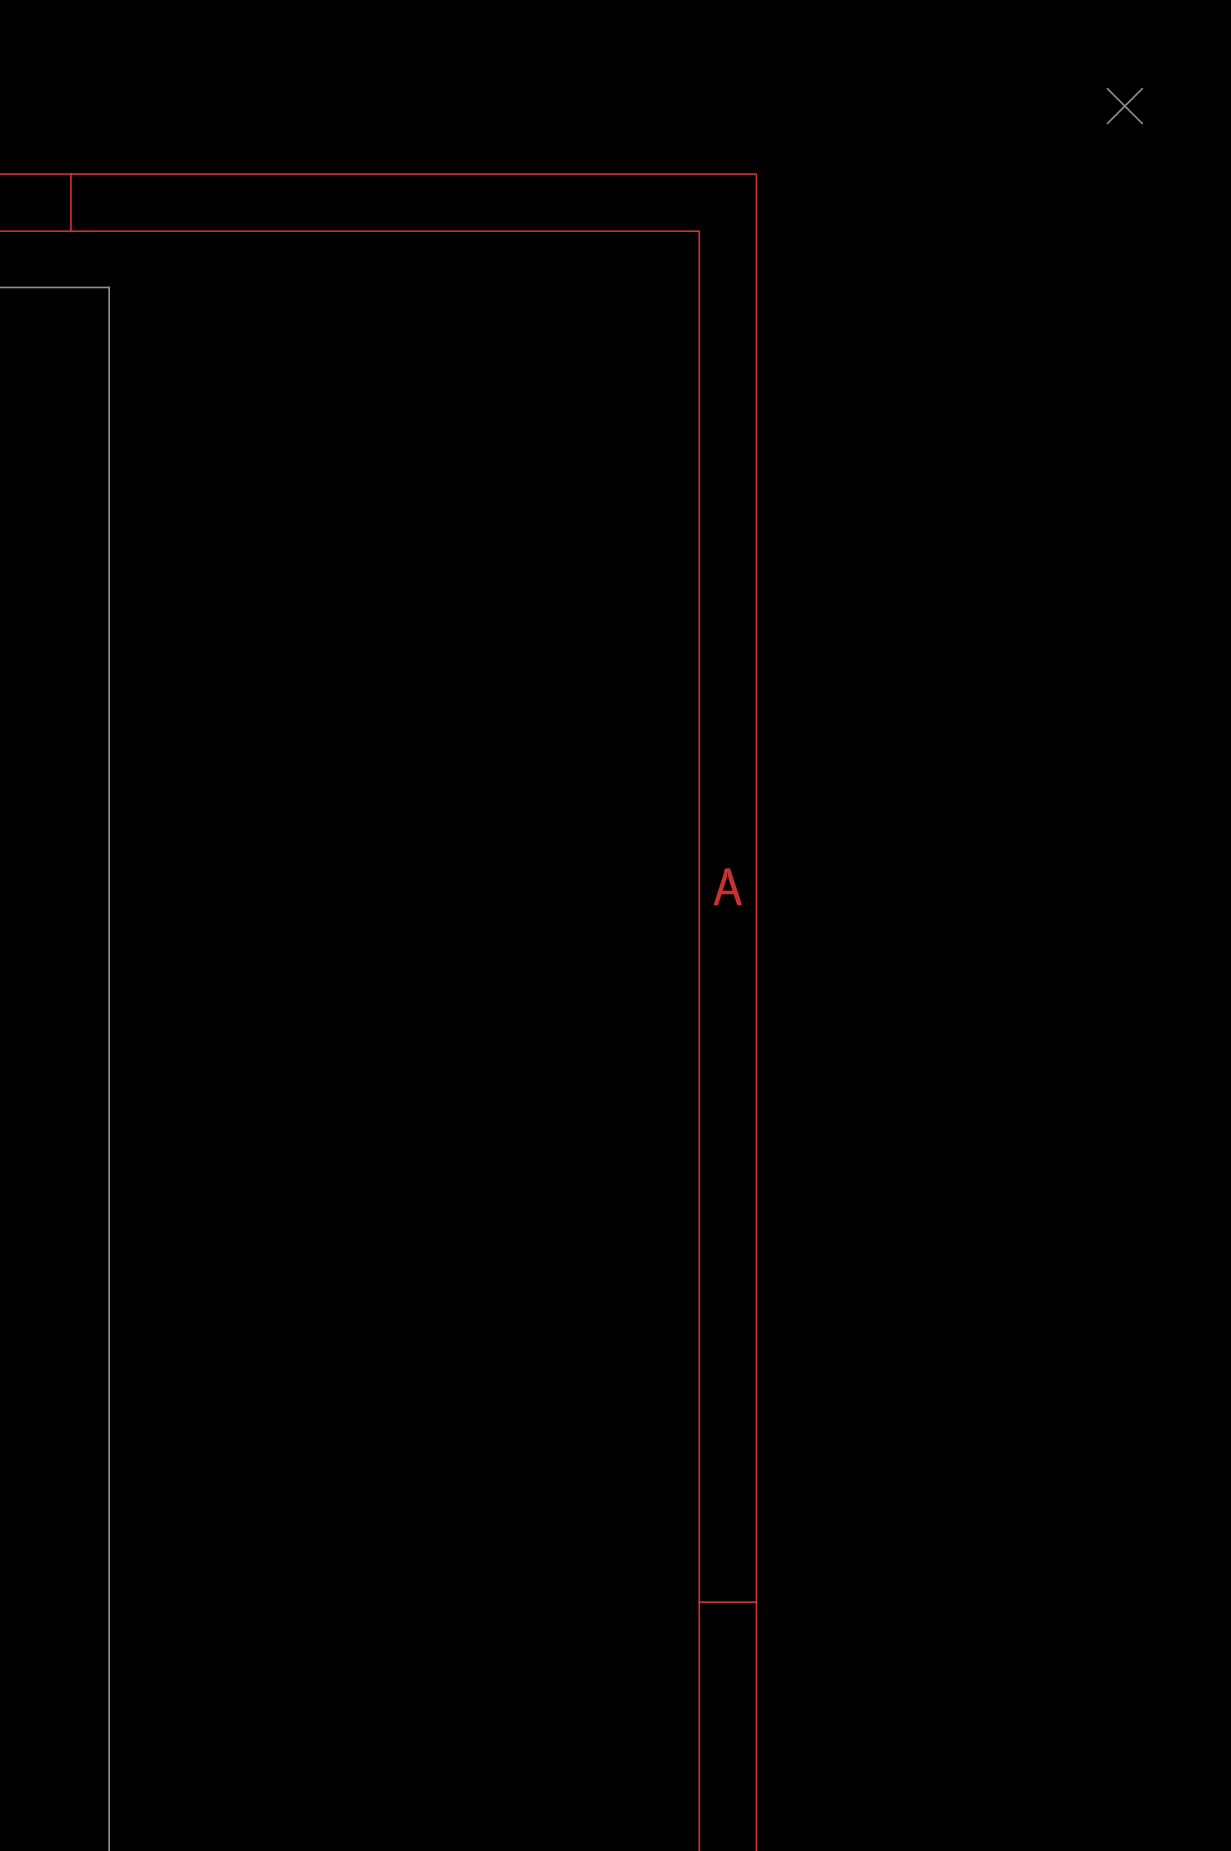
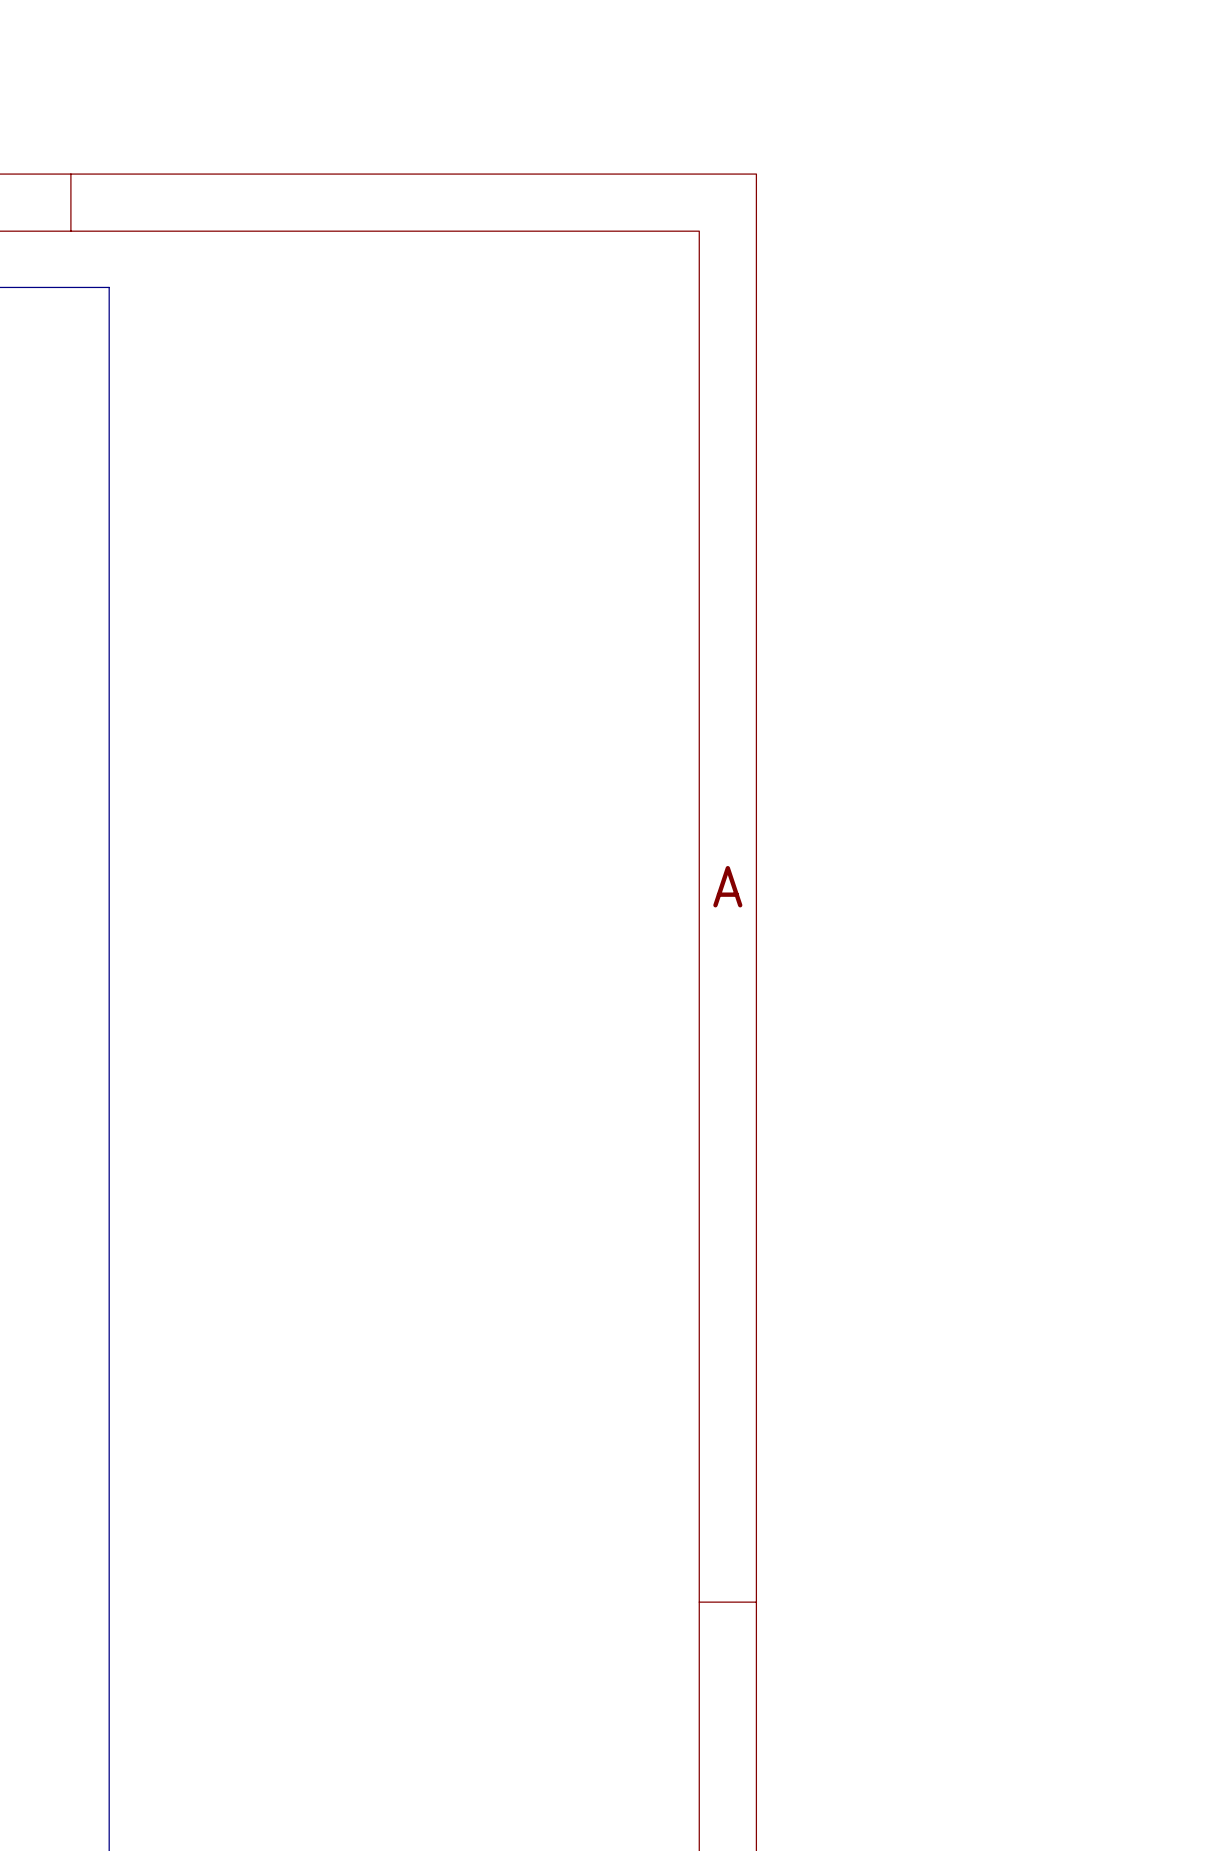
no-connect mark: (1124, 106) -> none

